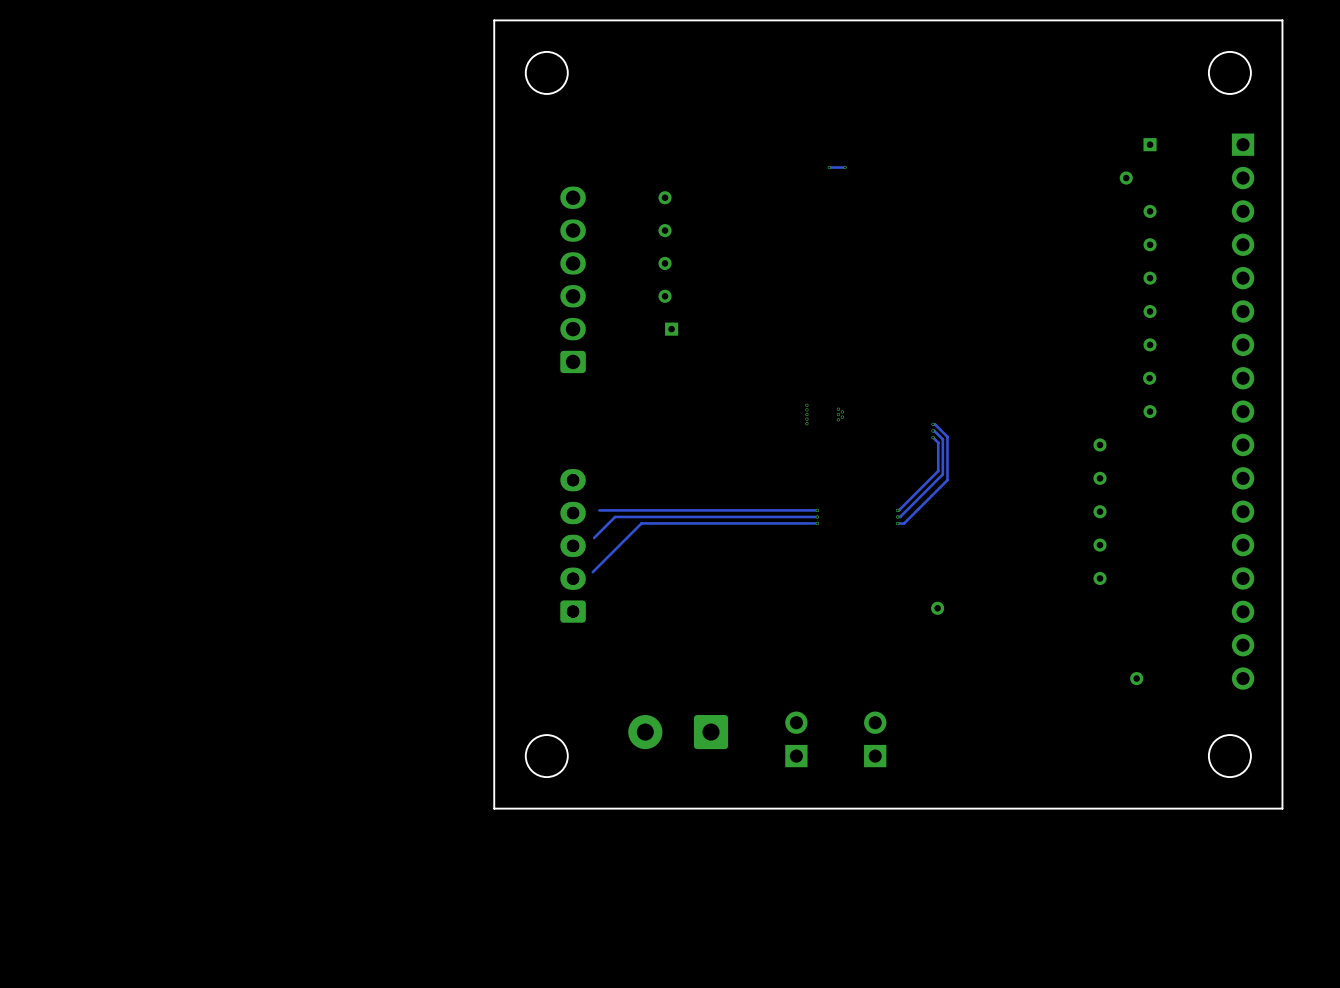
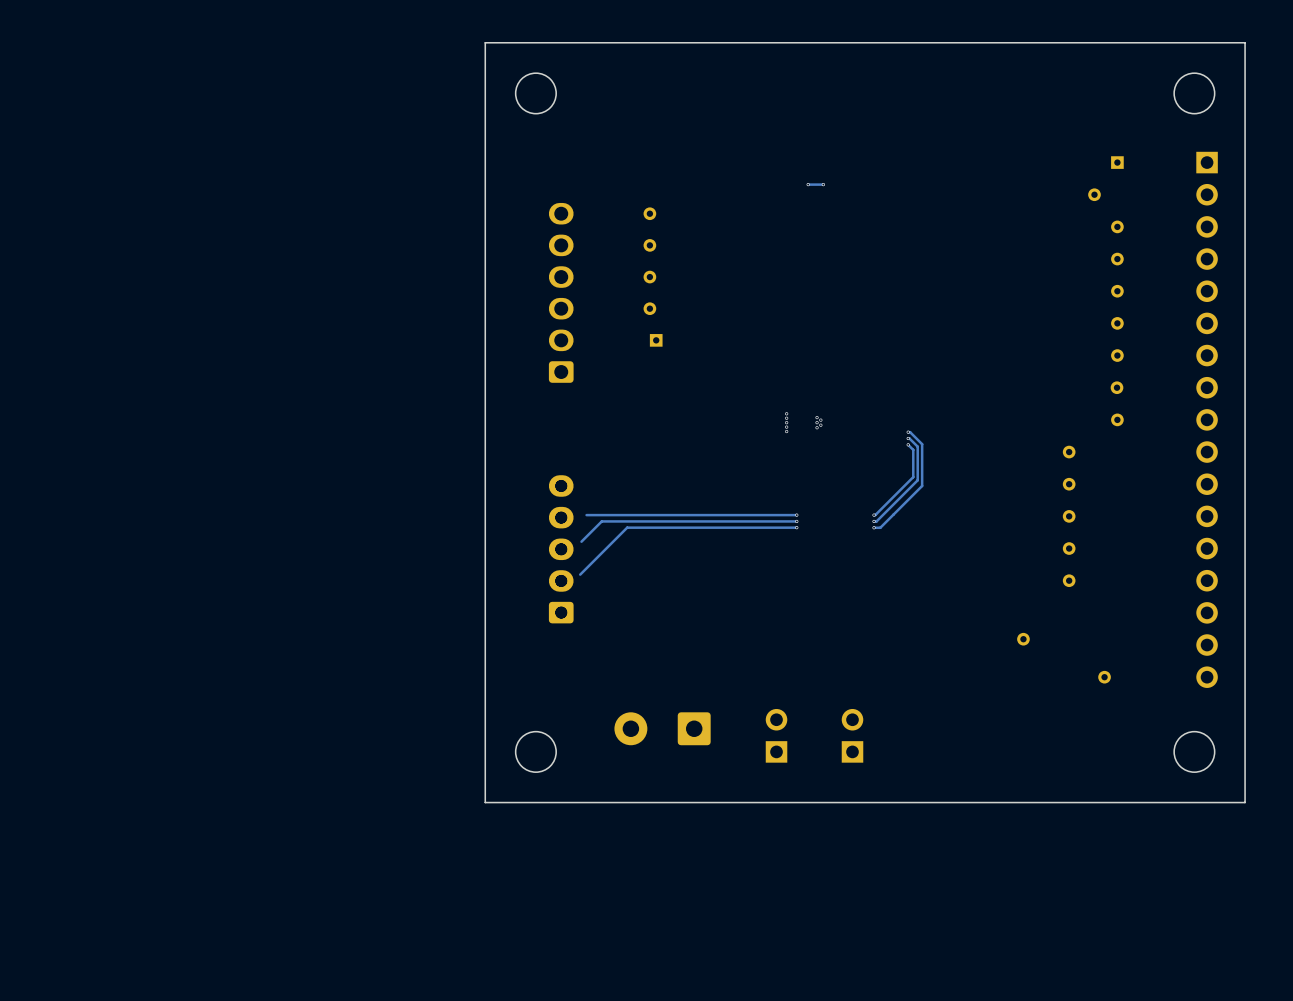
part position: (937, 608) -> (1023, 639)

